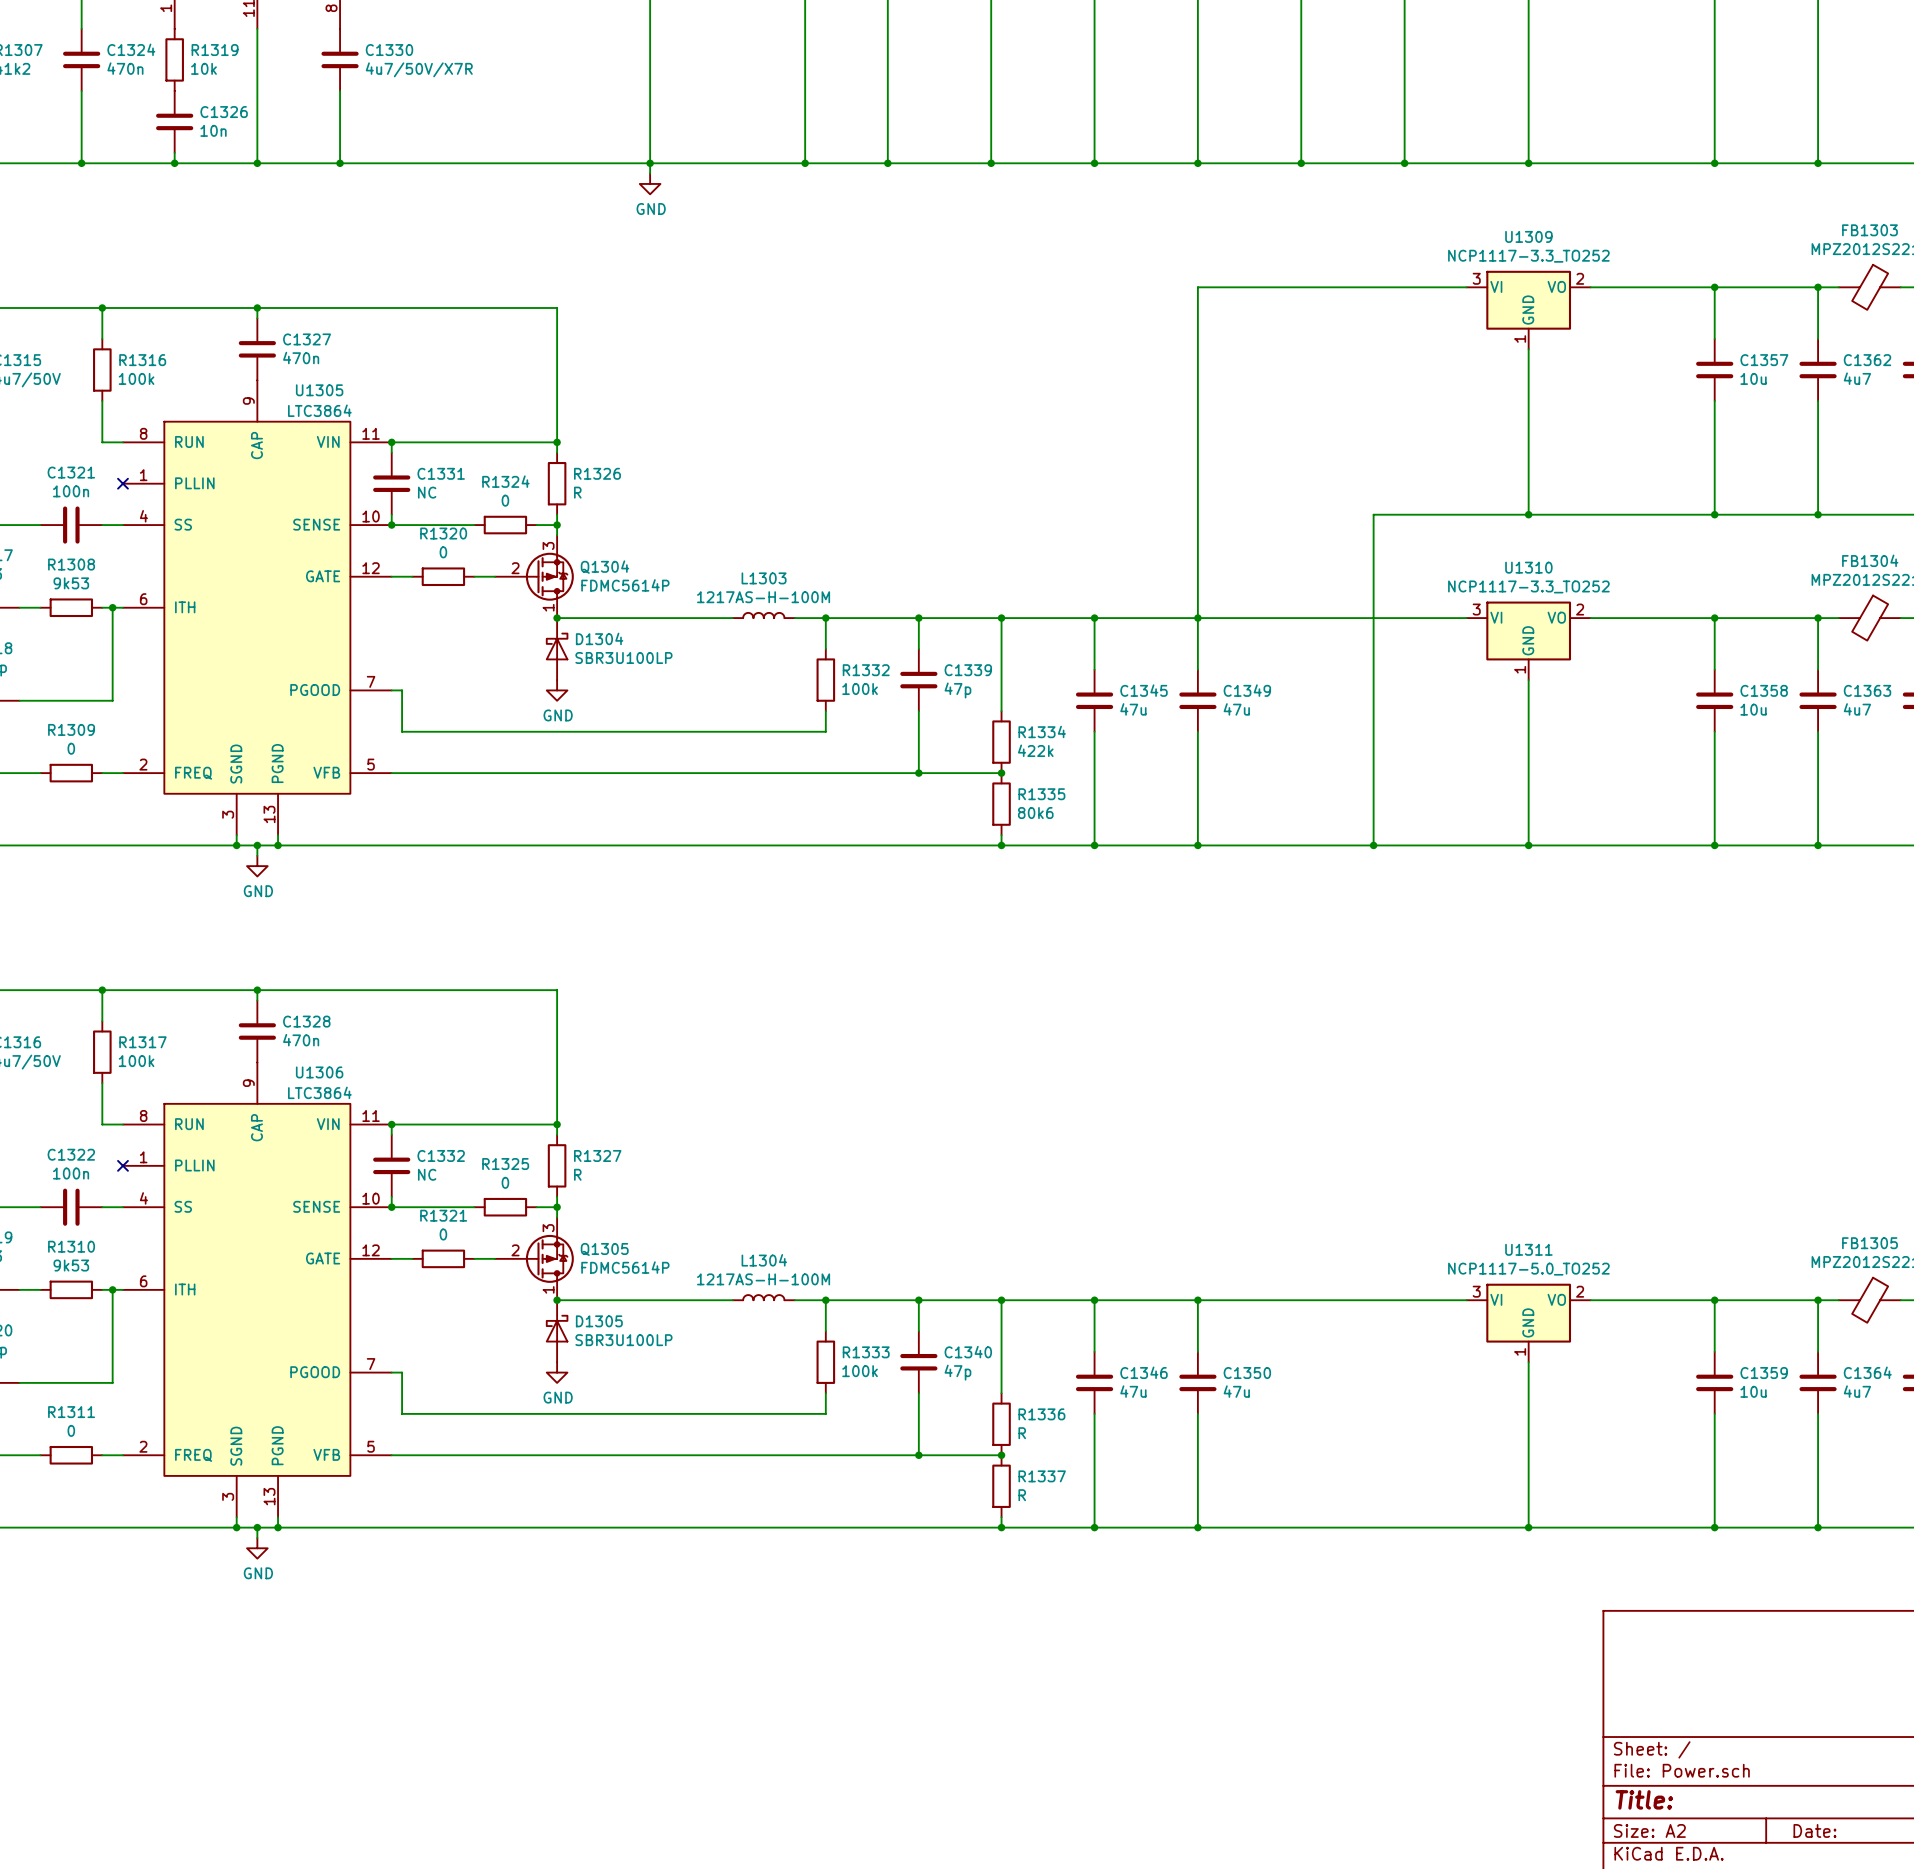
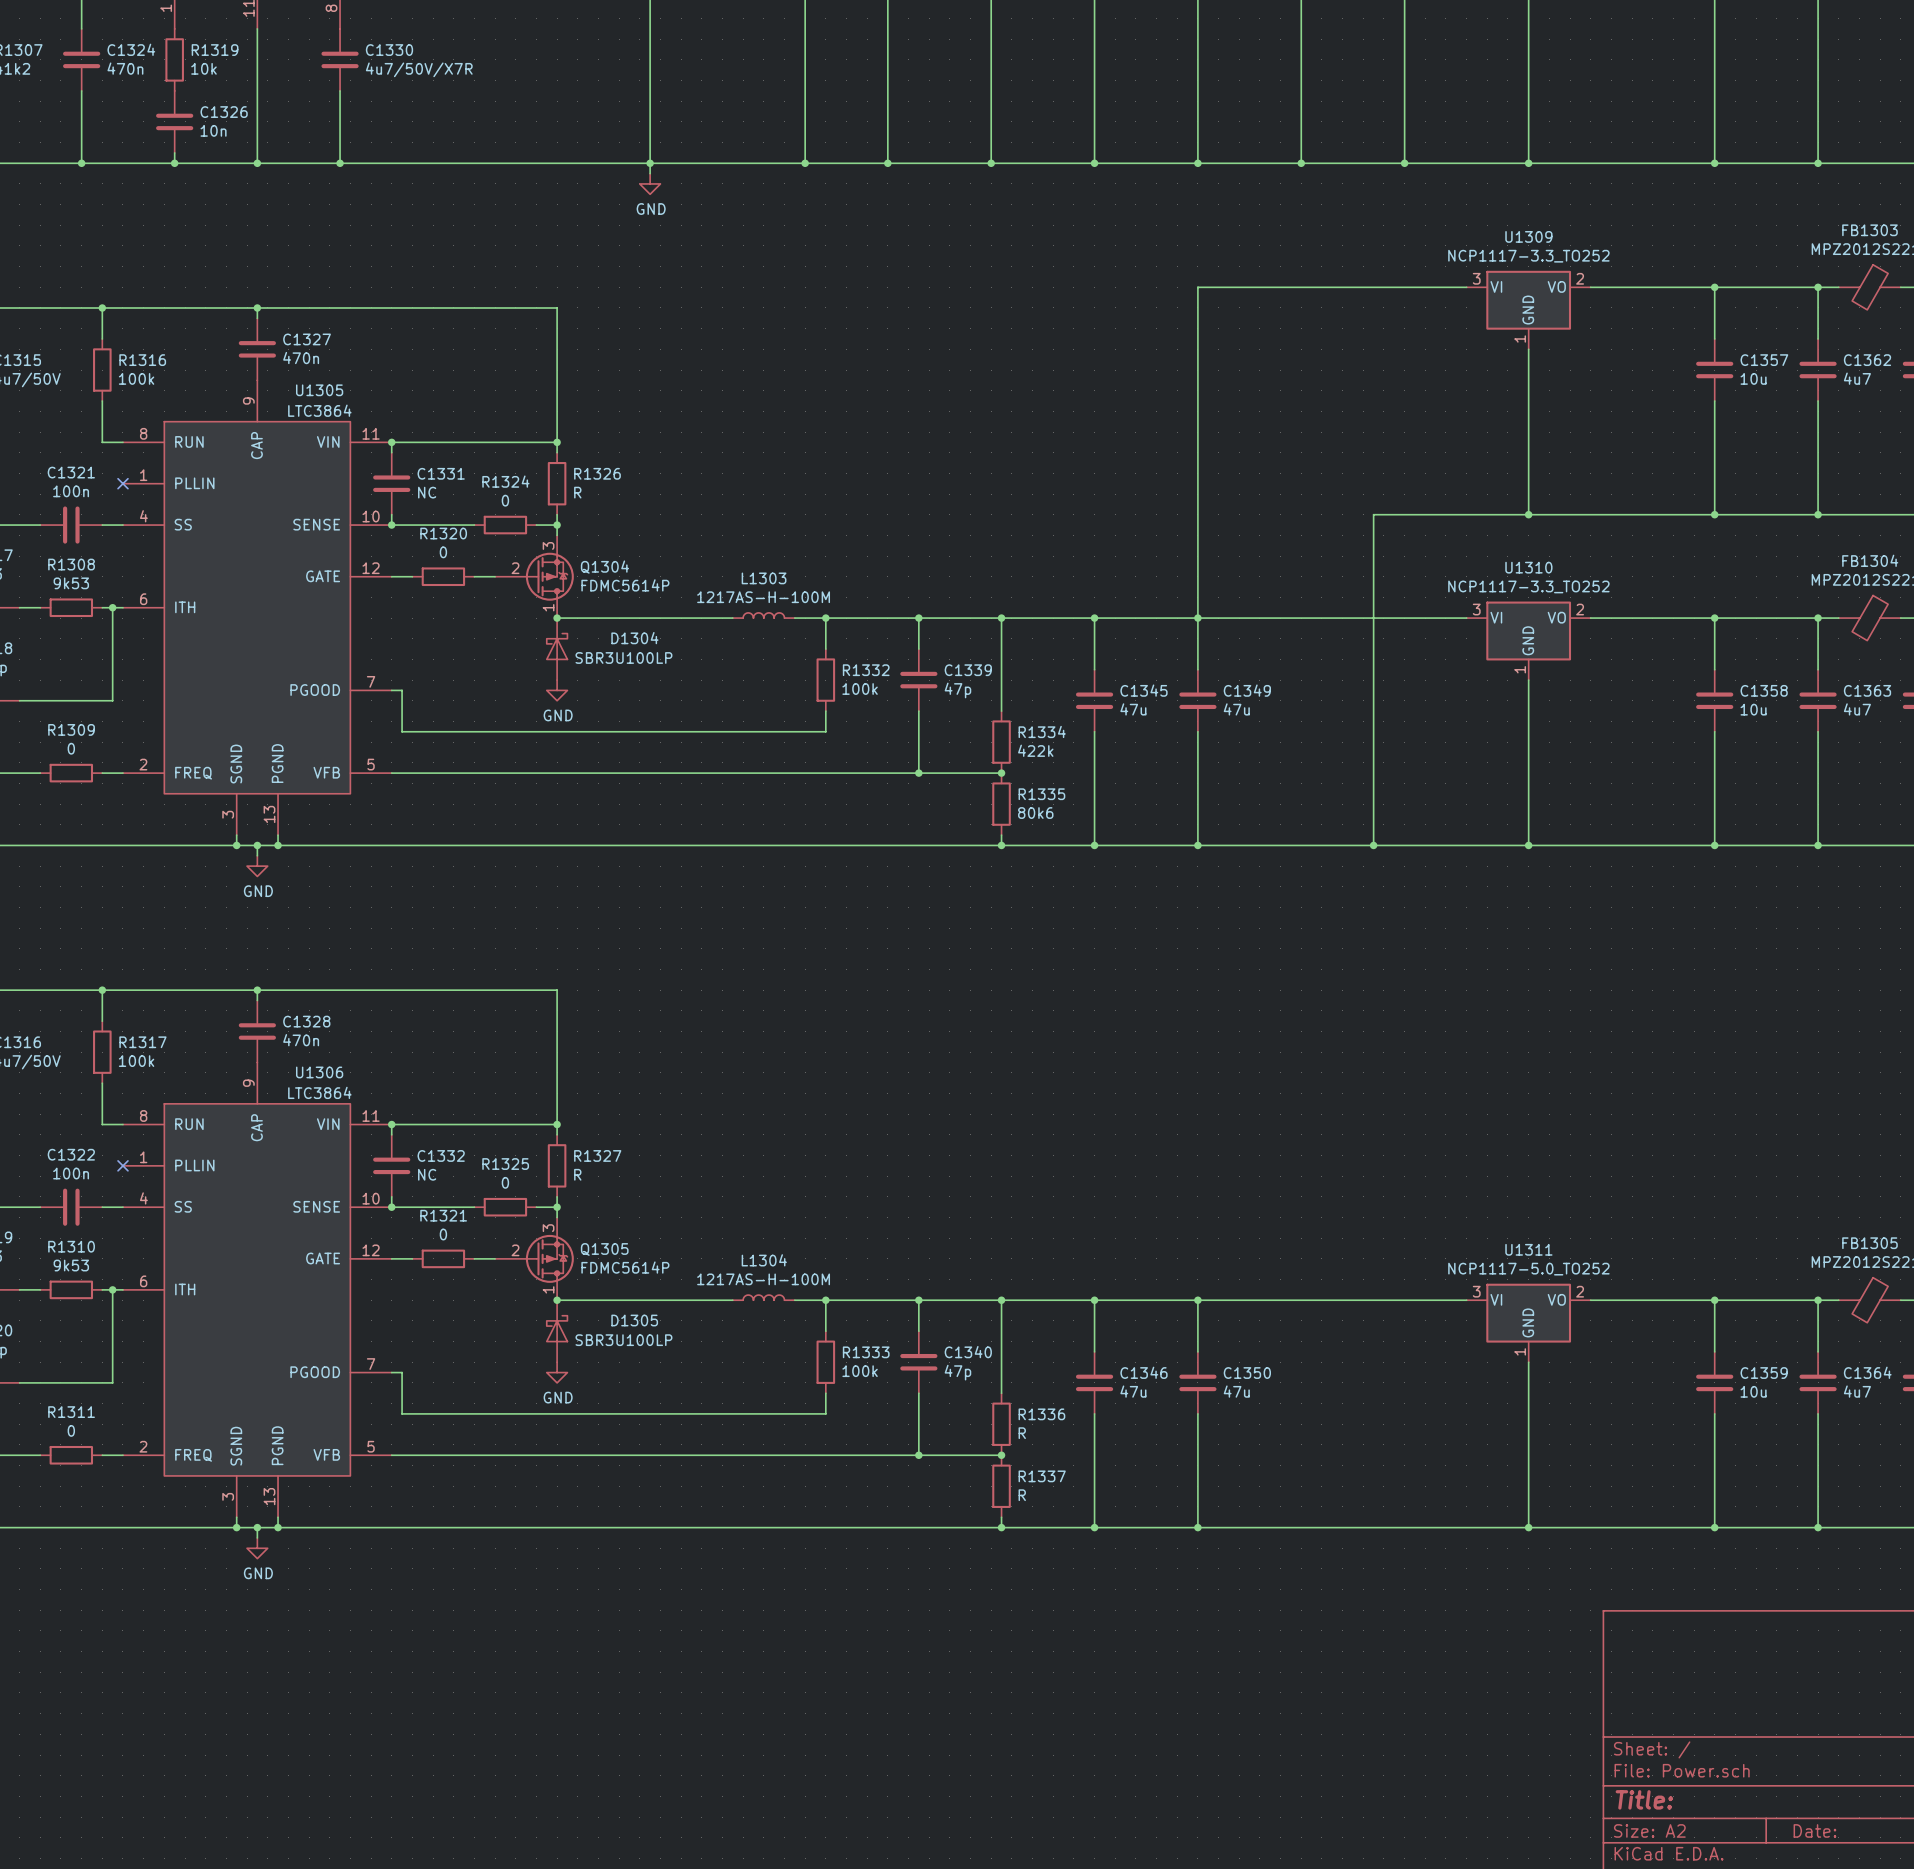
D1304 name position: D1304 (599, 638) -> D1304 (634, 638)
D1305 name position: D1305 (599, 1321) -> D1305 (634, 1320)

